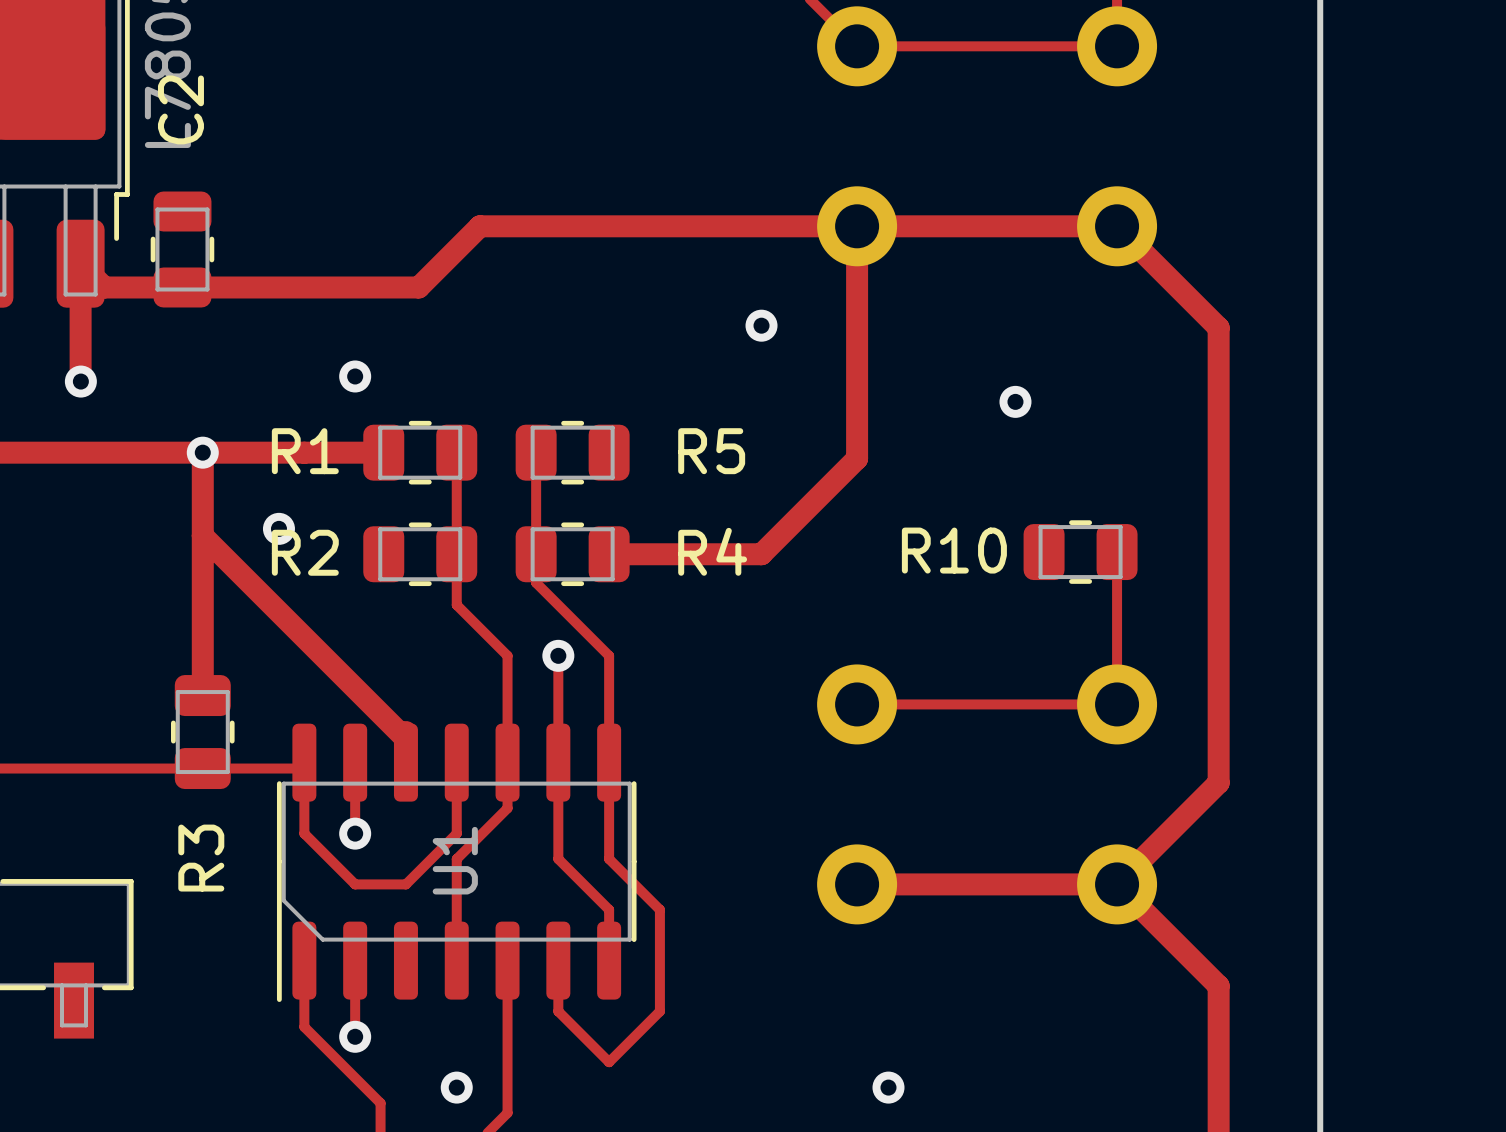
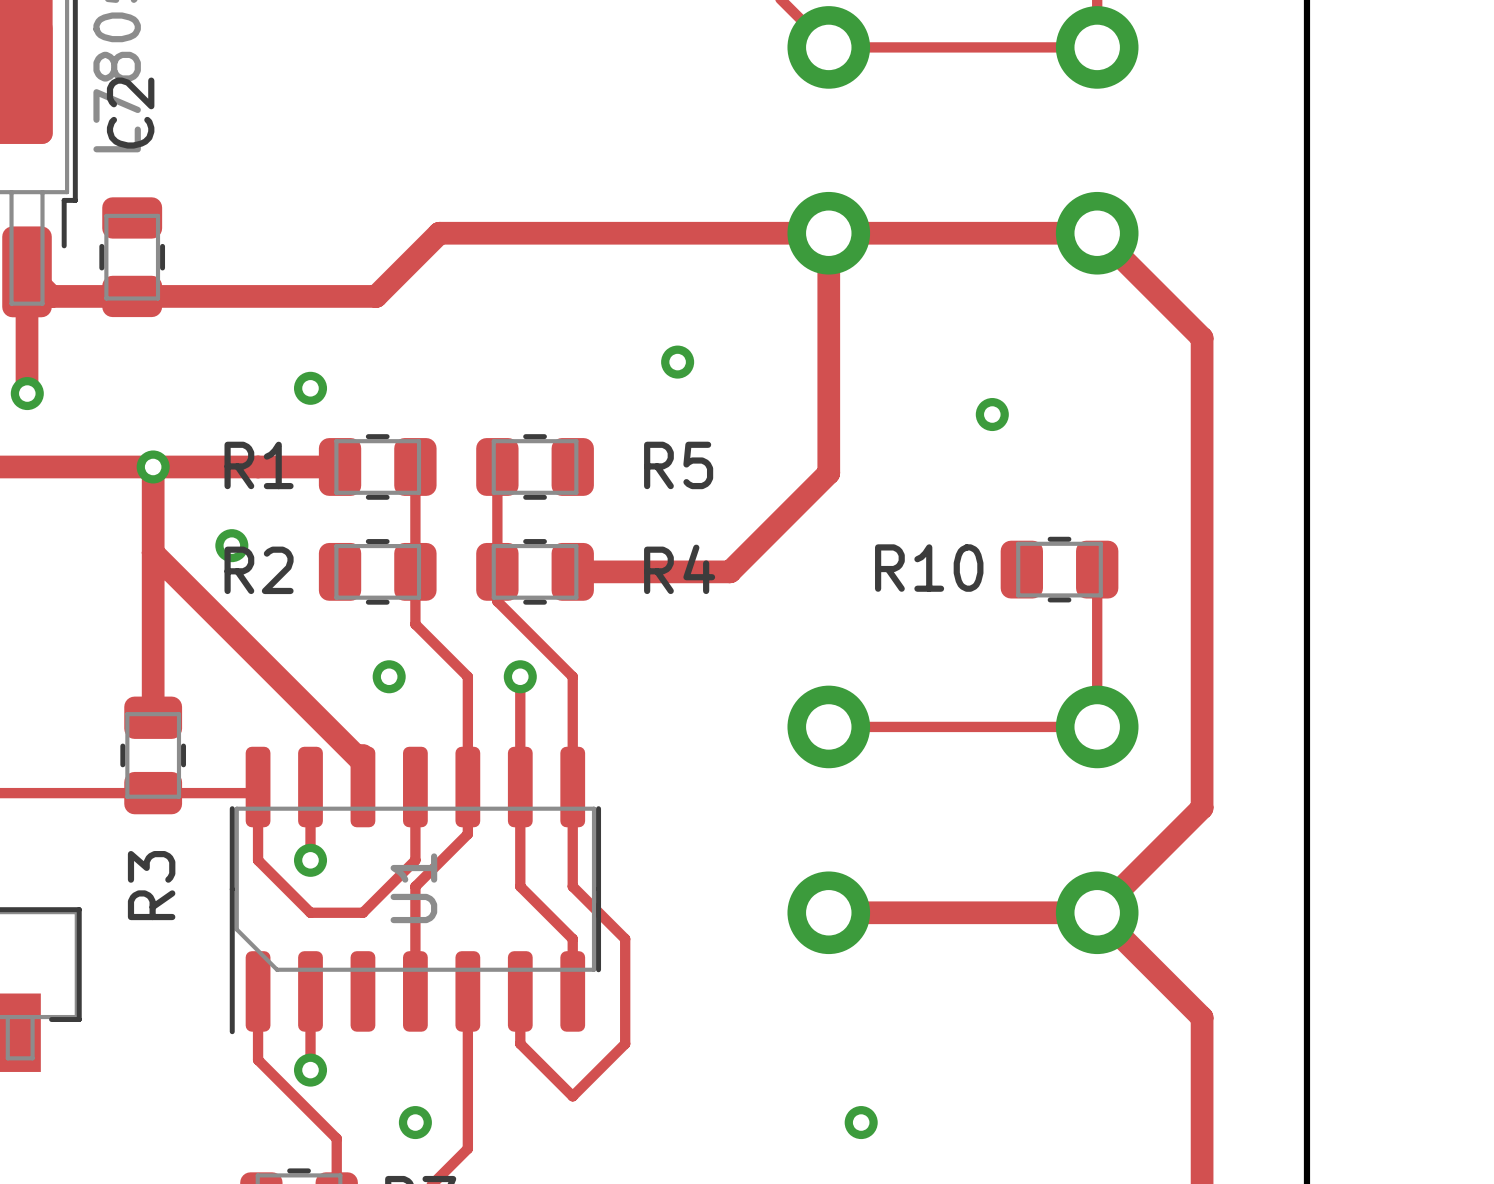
via position: (761, 325) -> (677, 362)
via: none -> (389, 676)

